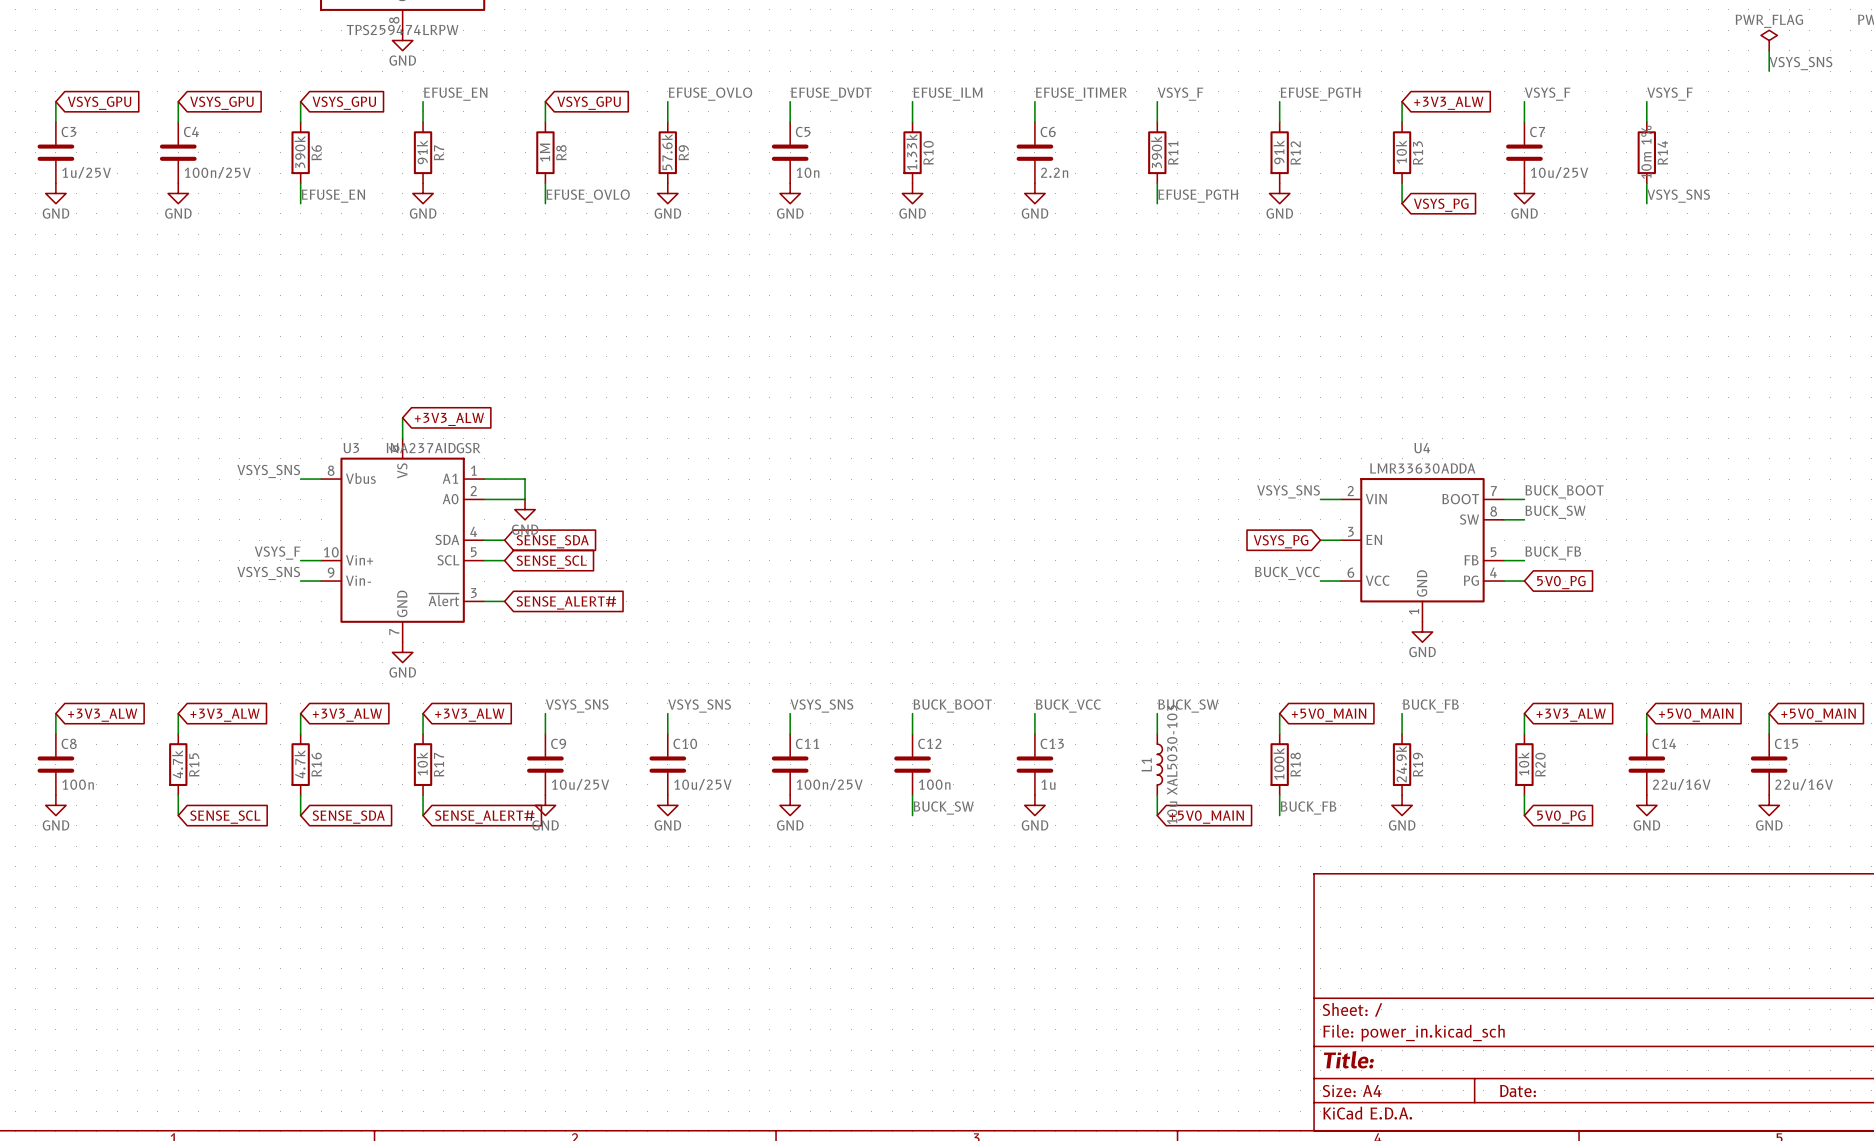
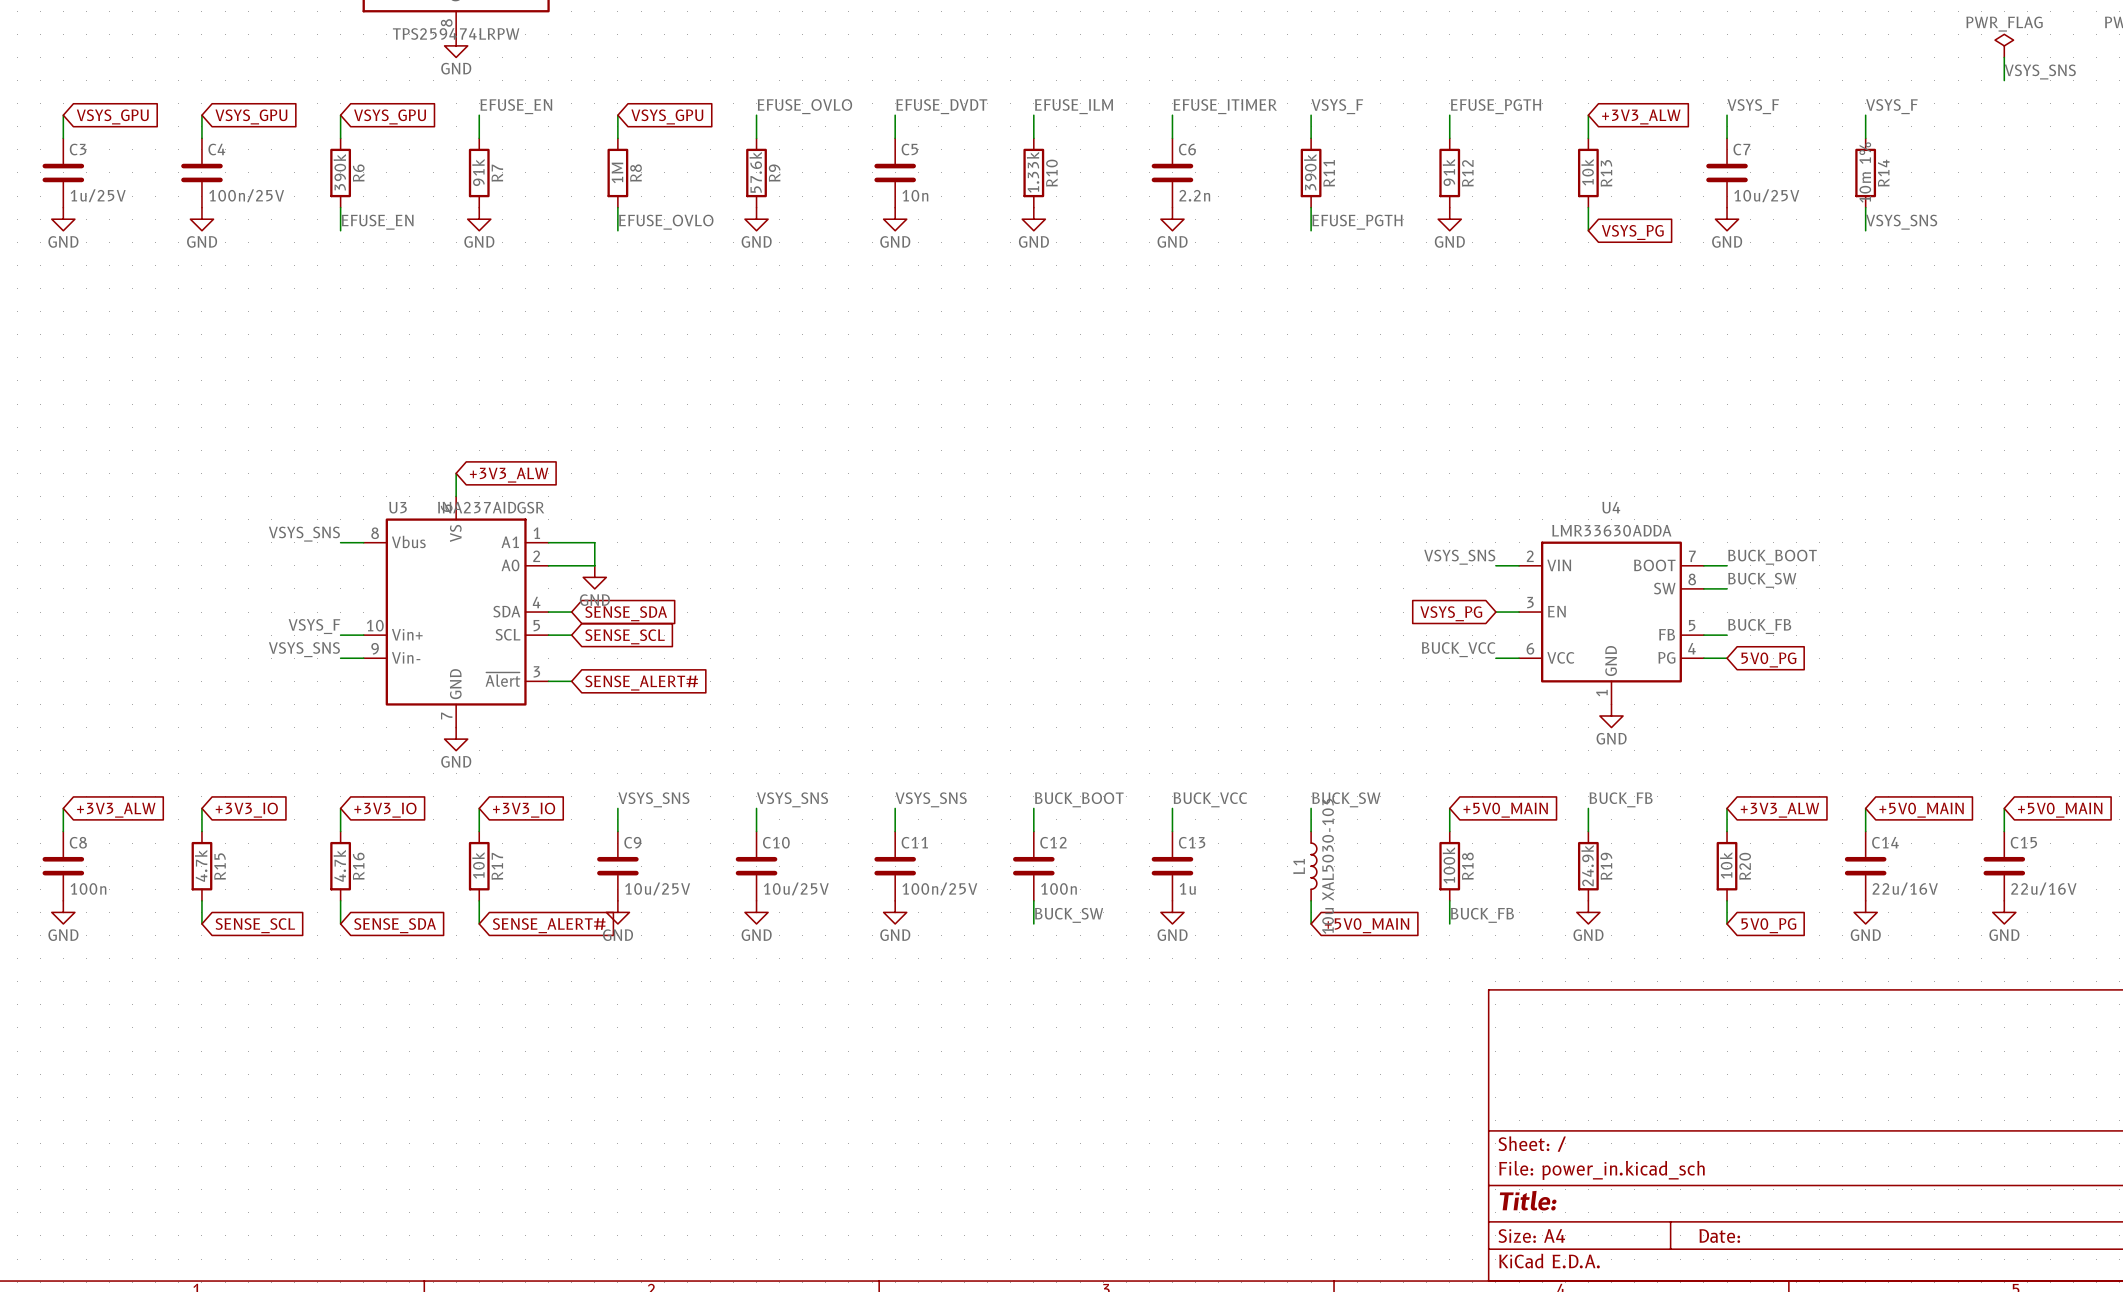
global label: +3V3_ALW (225, 715) -> +3V3_IO (246, 810)
global label: +3V3_ALW (347, 715) -> +3V3_IO (385, 810)
global label: +3V3_ALW (469, 715) -> +3V3_IO (524, 810)

